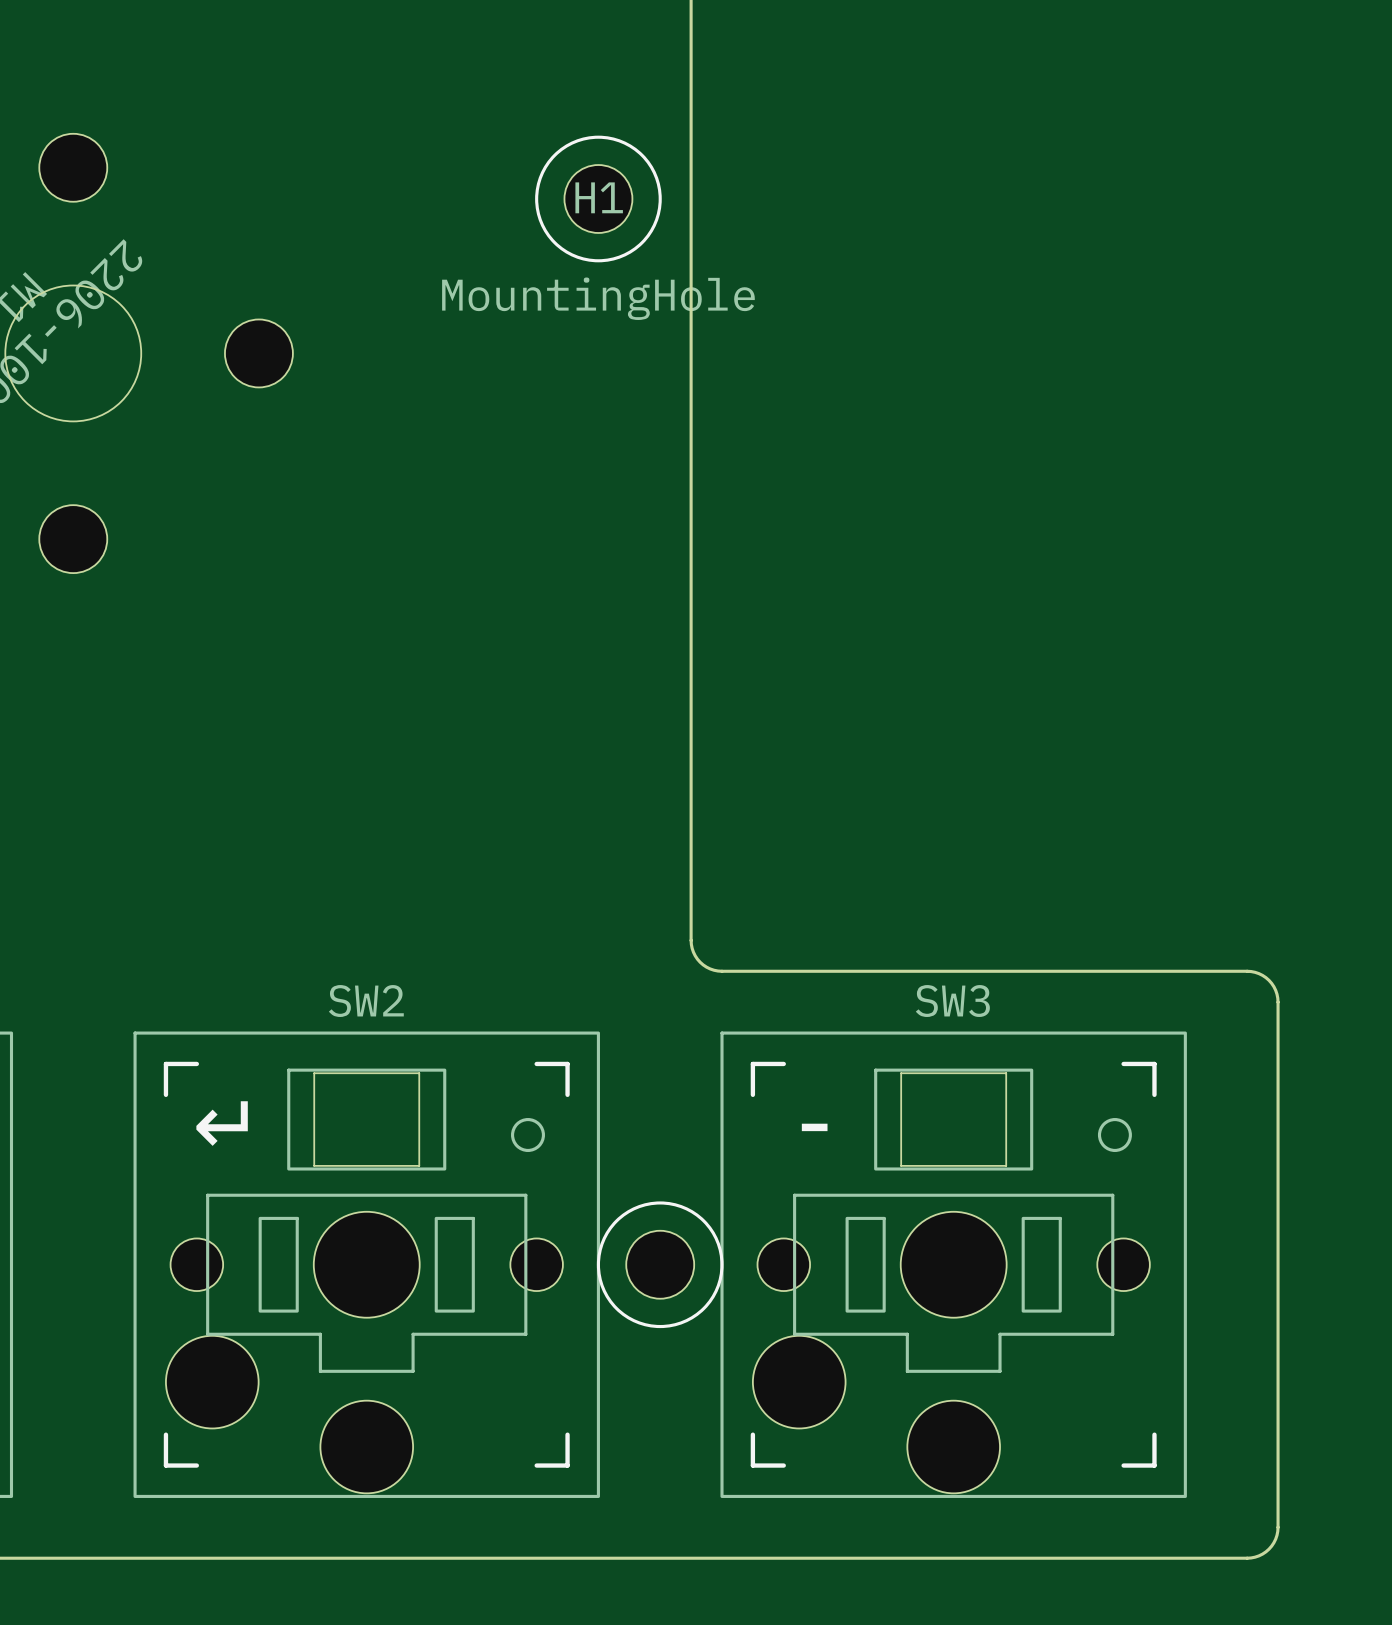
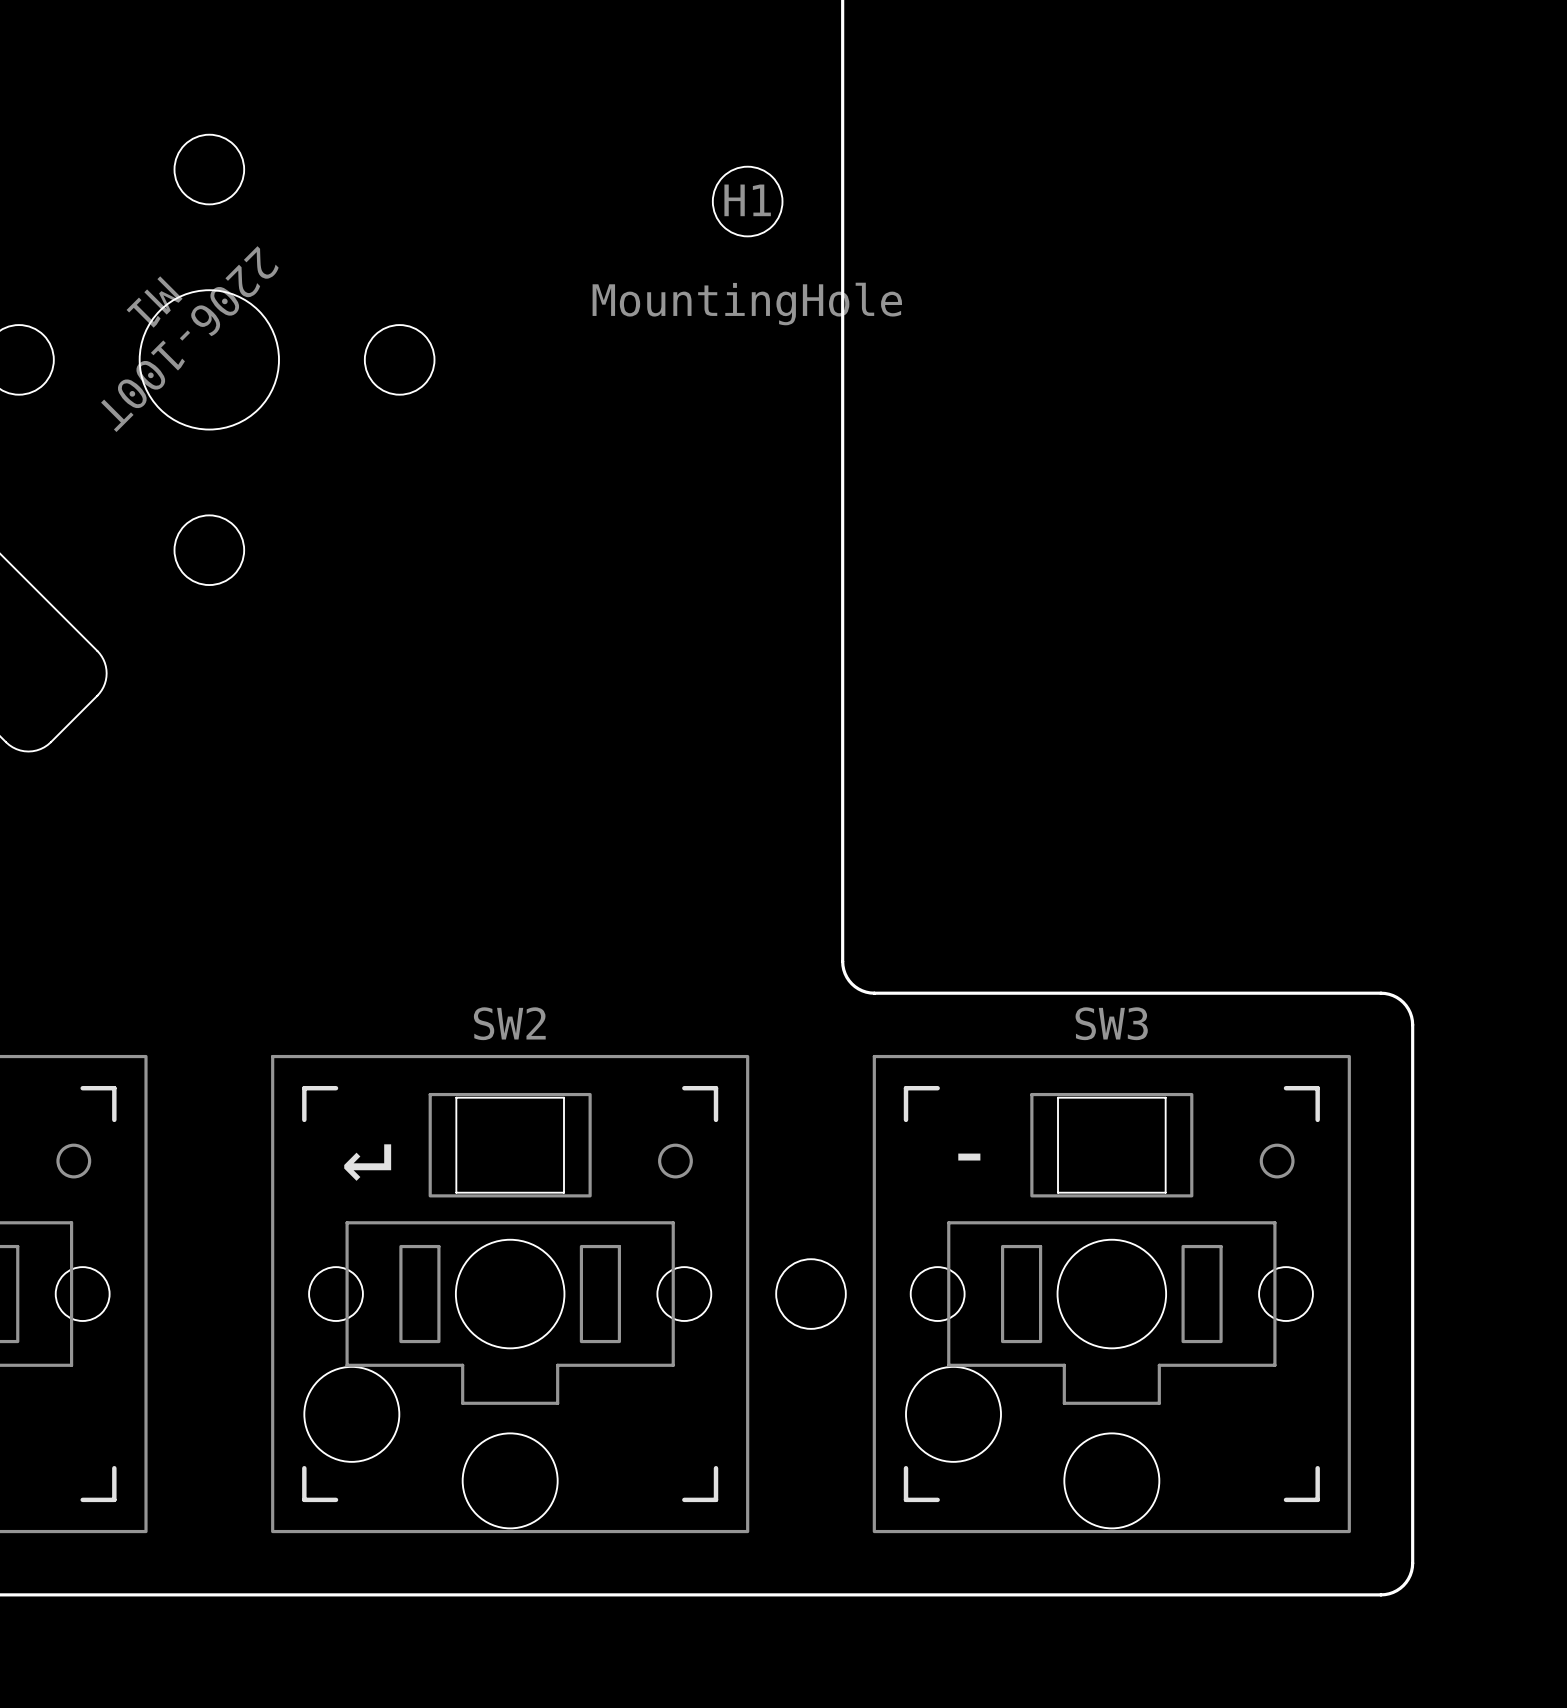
drawing: [535, 135, 662, 263] -> none
board edge: (1216, 971) (1251, 971) (1262, 975) (1273, 986) (1278, 1002) (1277, 1531) (1271, 1546) (1258, 1555) (1247, 1558) (1216, 1558) -> (1381, 993) (1393, 995) (1403, 1002) (1410, 1012) (1412, 1024) (1412, 1563) (1410, 1575) (1403, 1585) (1393, 1592) (1381, 1594)
drawing: [596, 1201, 724, 1329] -> none

